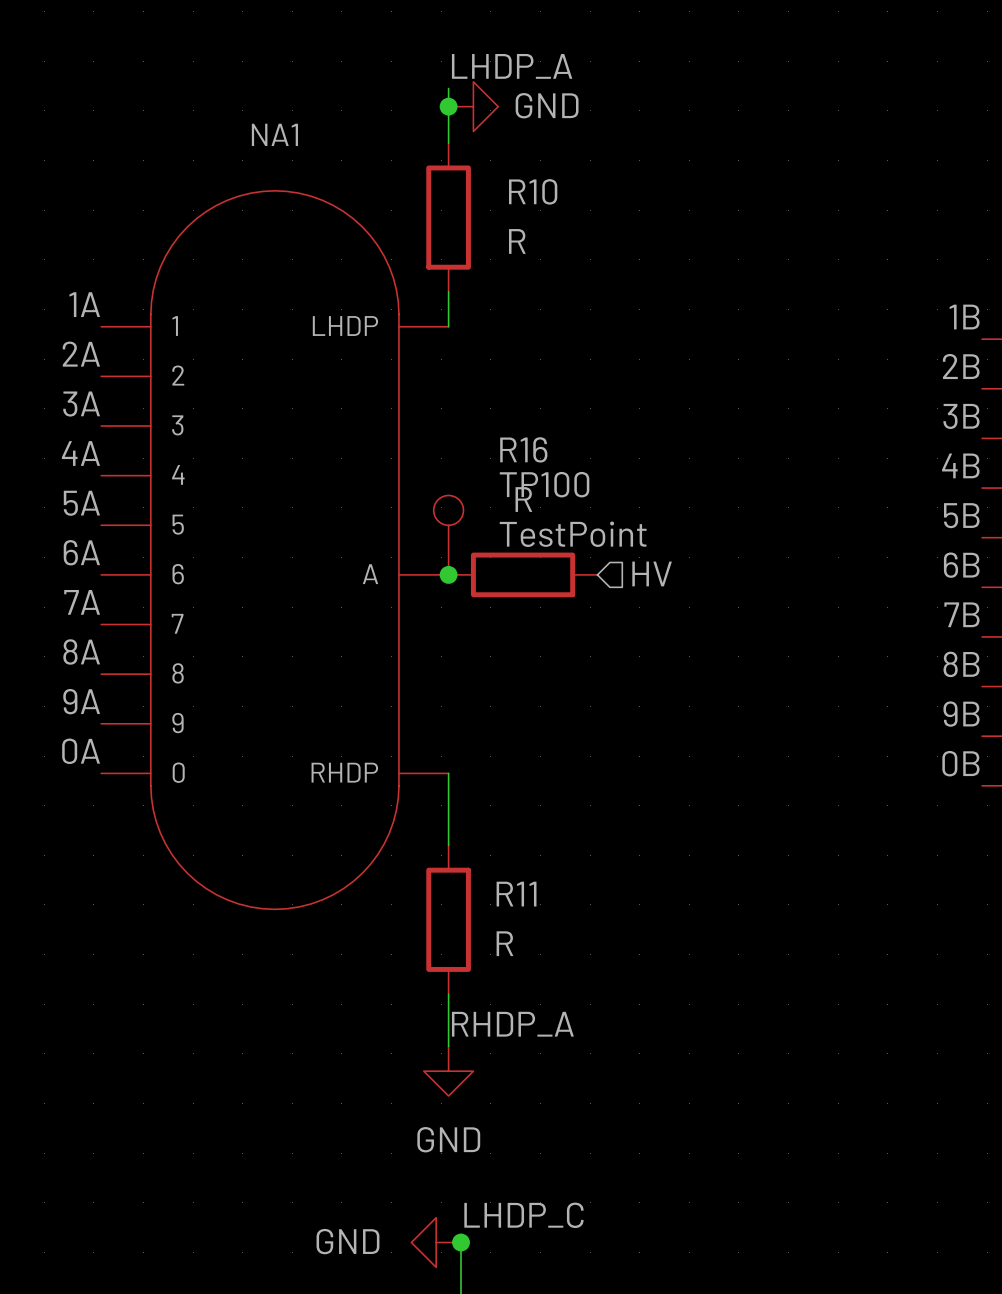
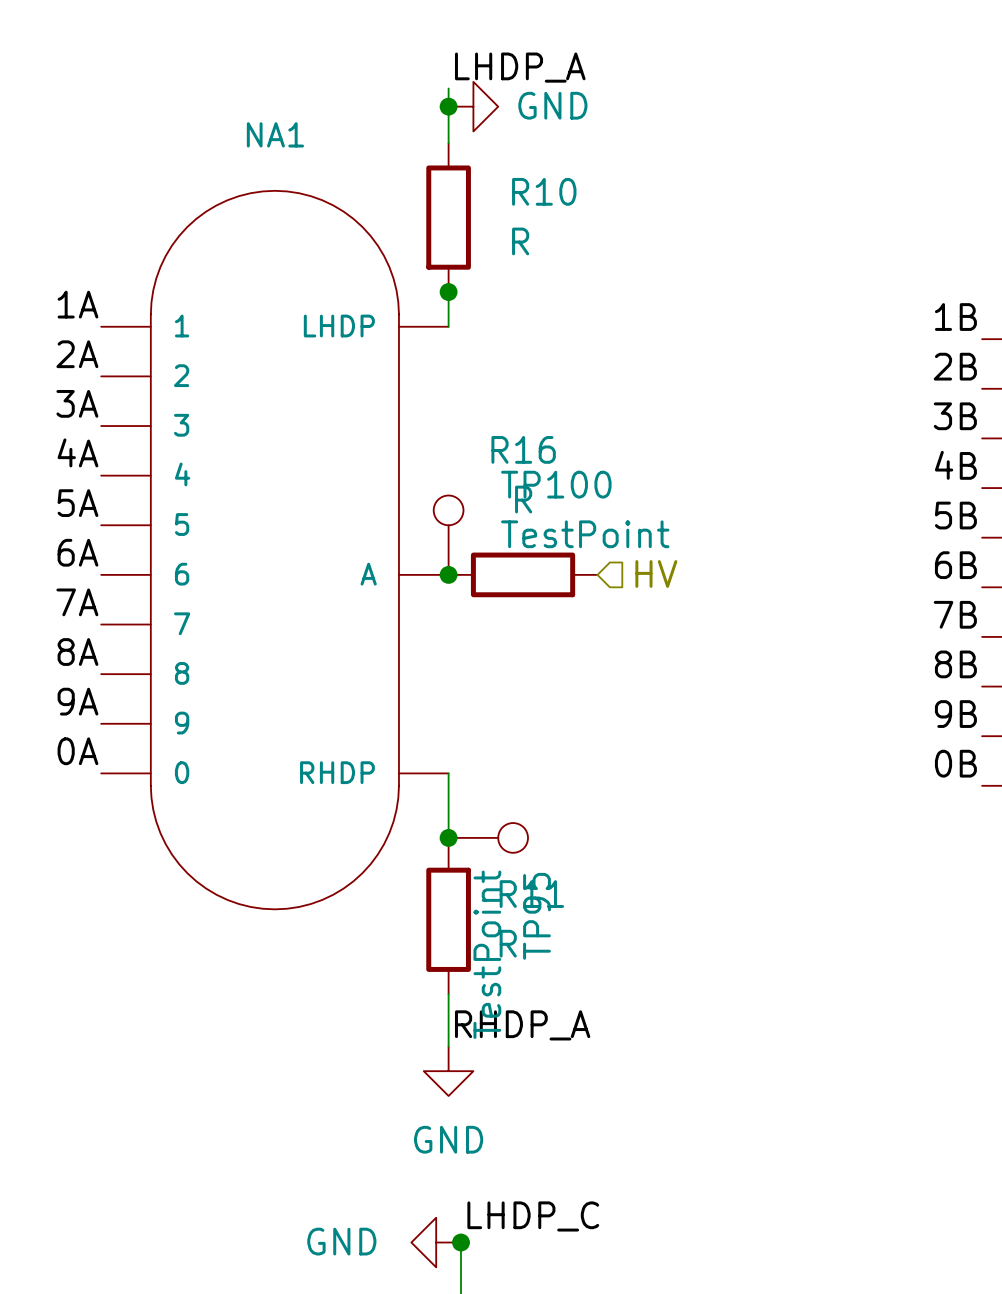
junction: none -> (448, 292)
junction: none -> (448, 837)
TP95: none -> TestPoint (488, 837)

